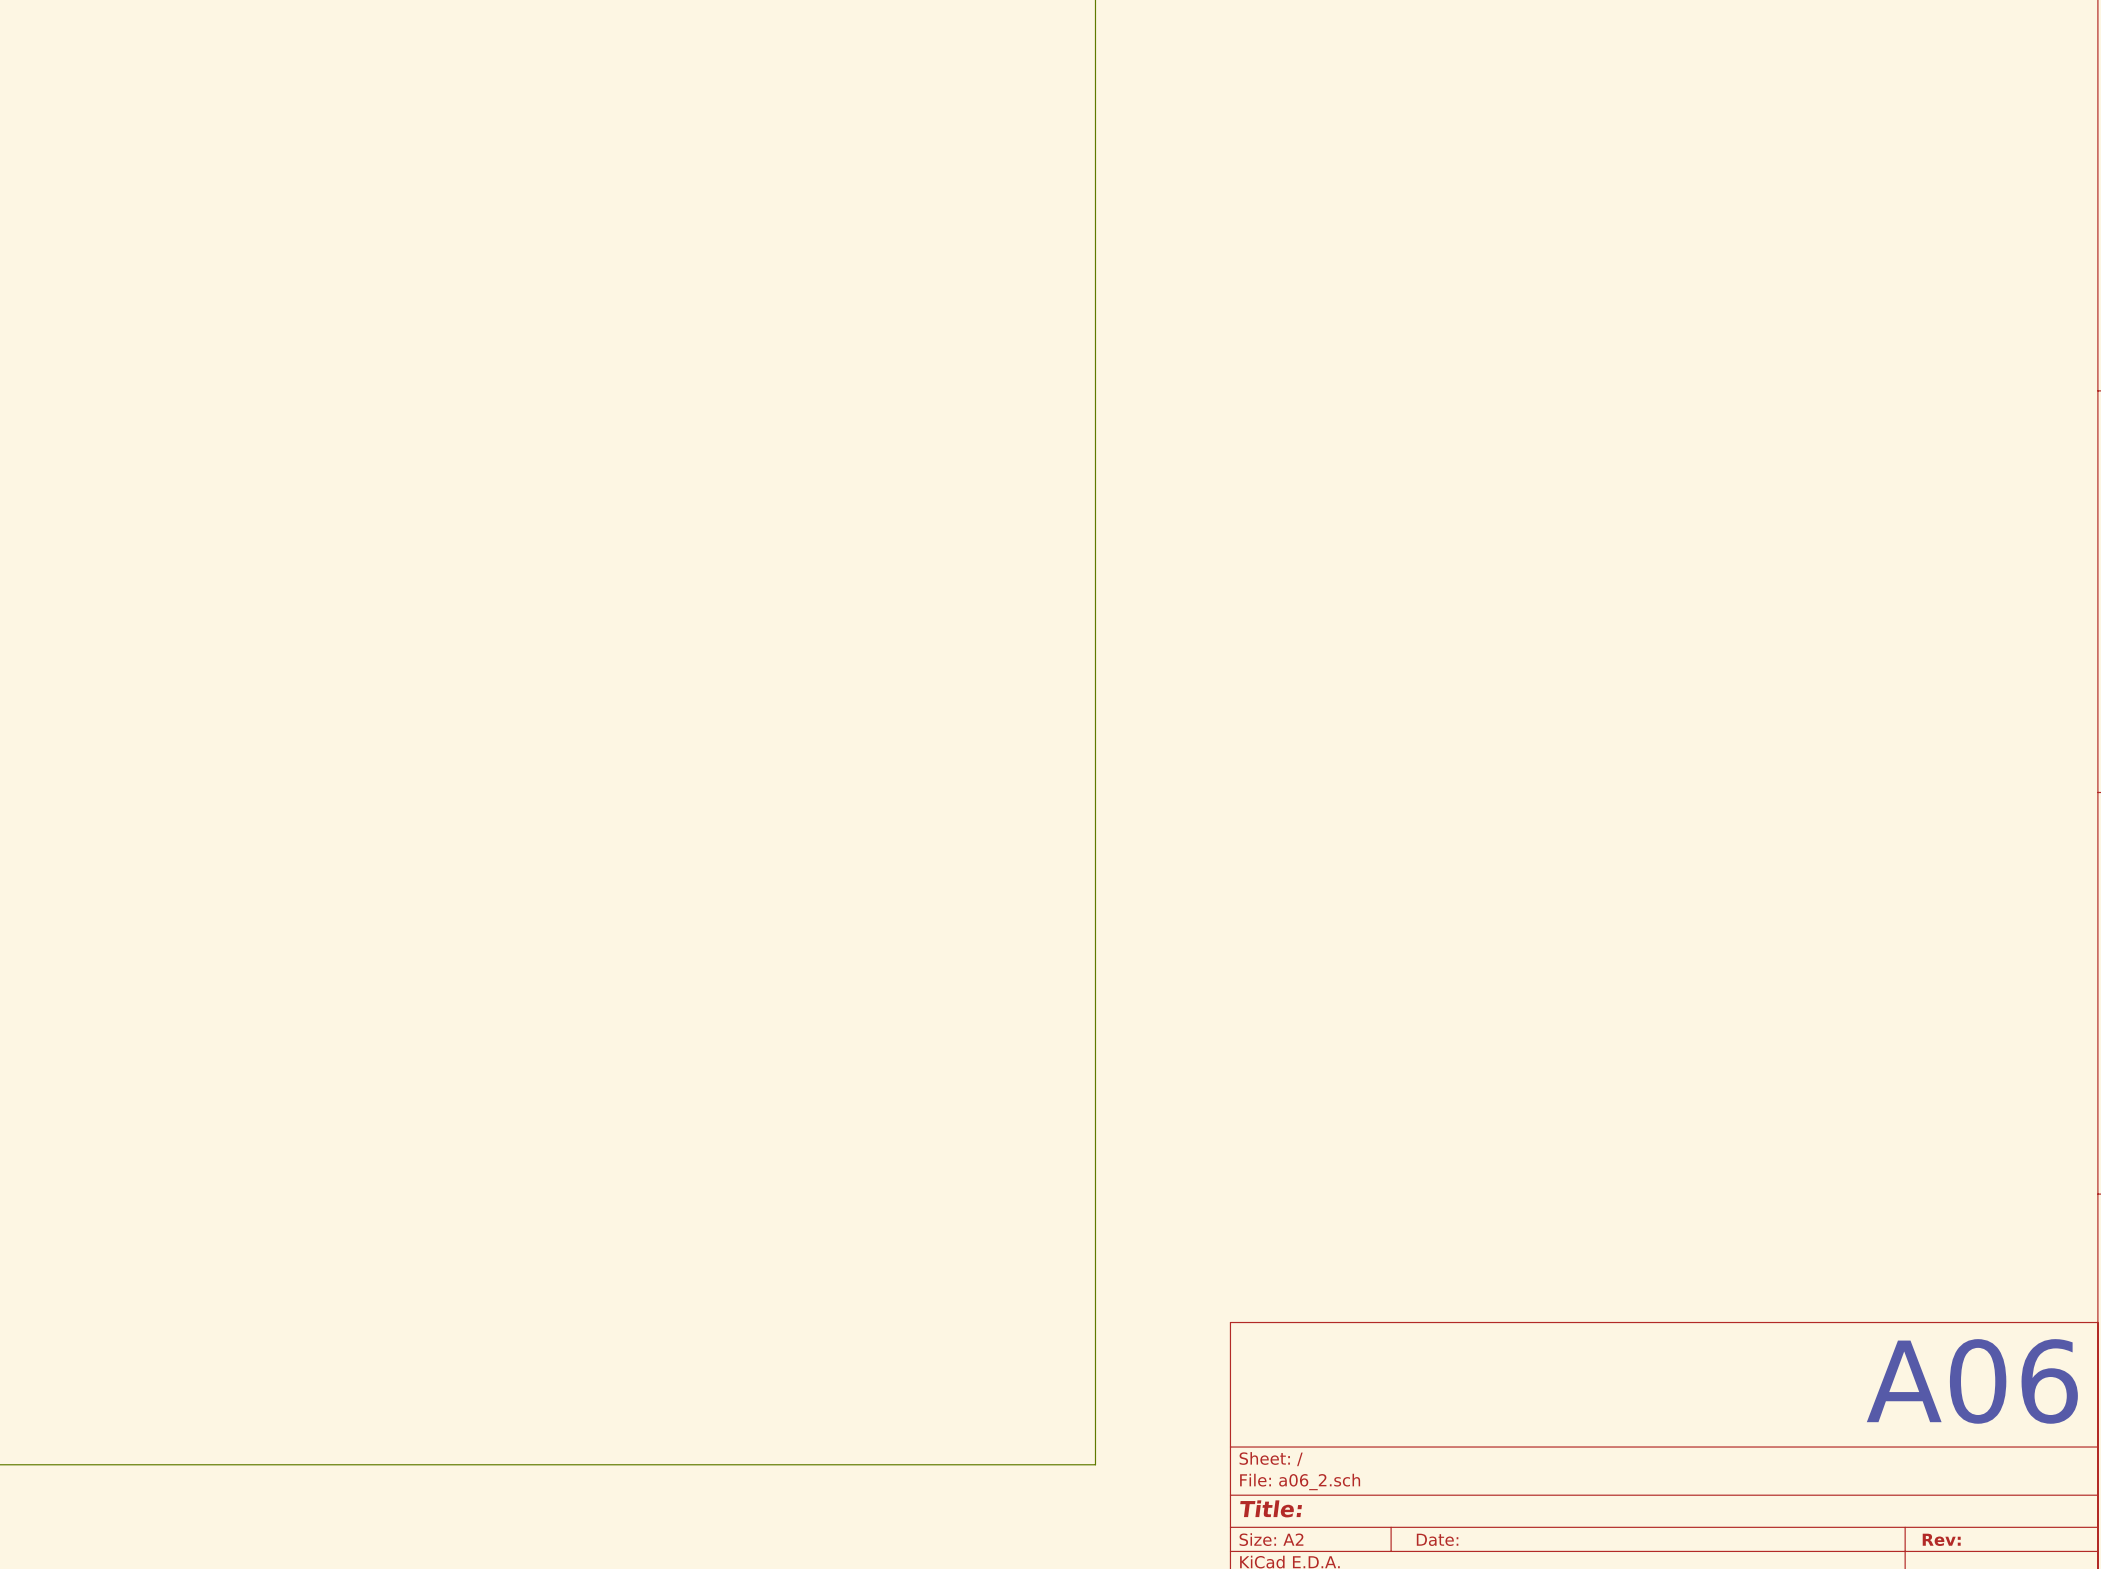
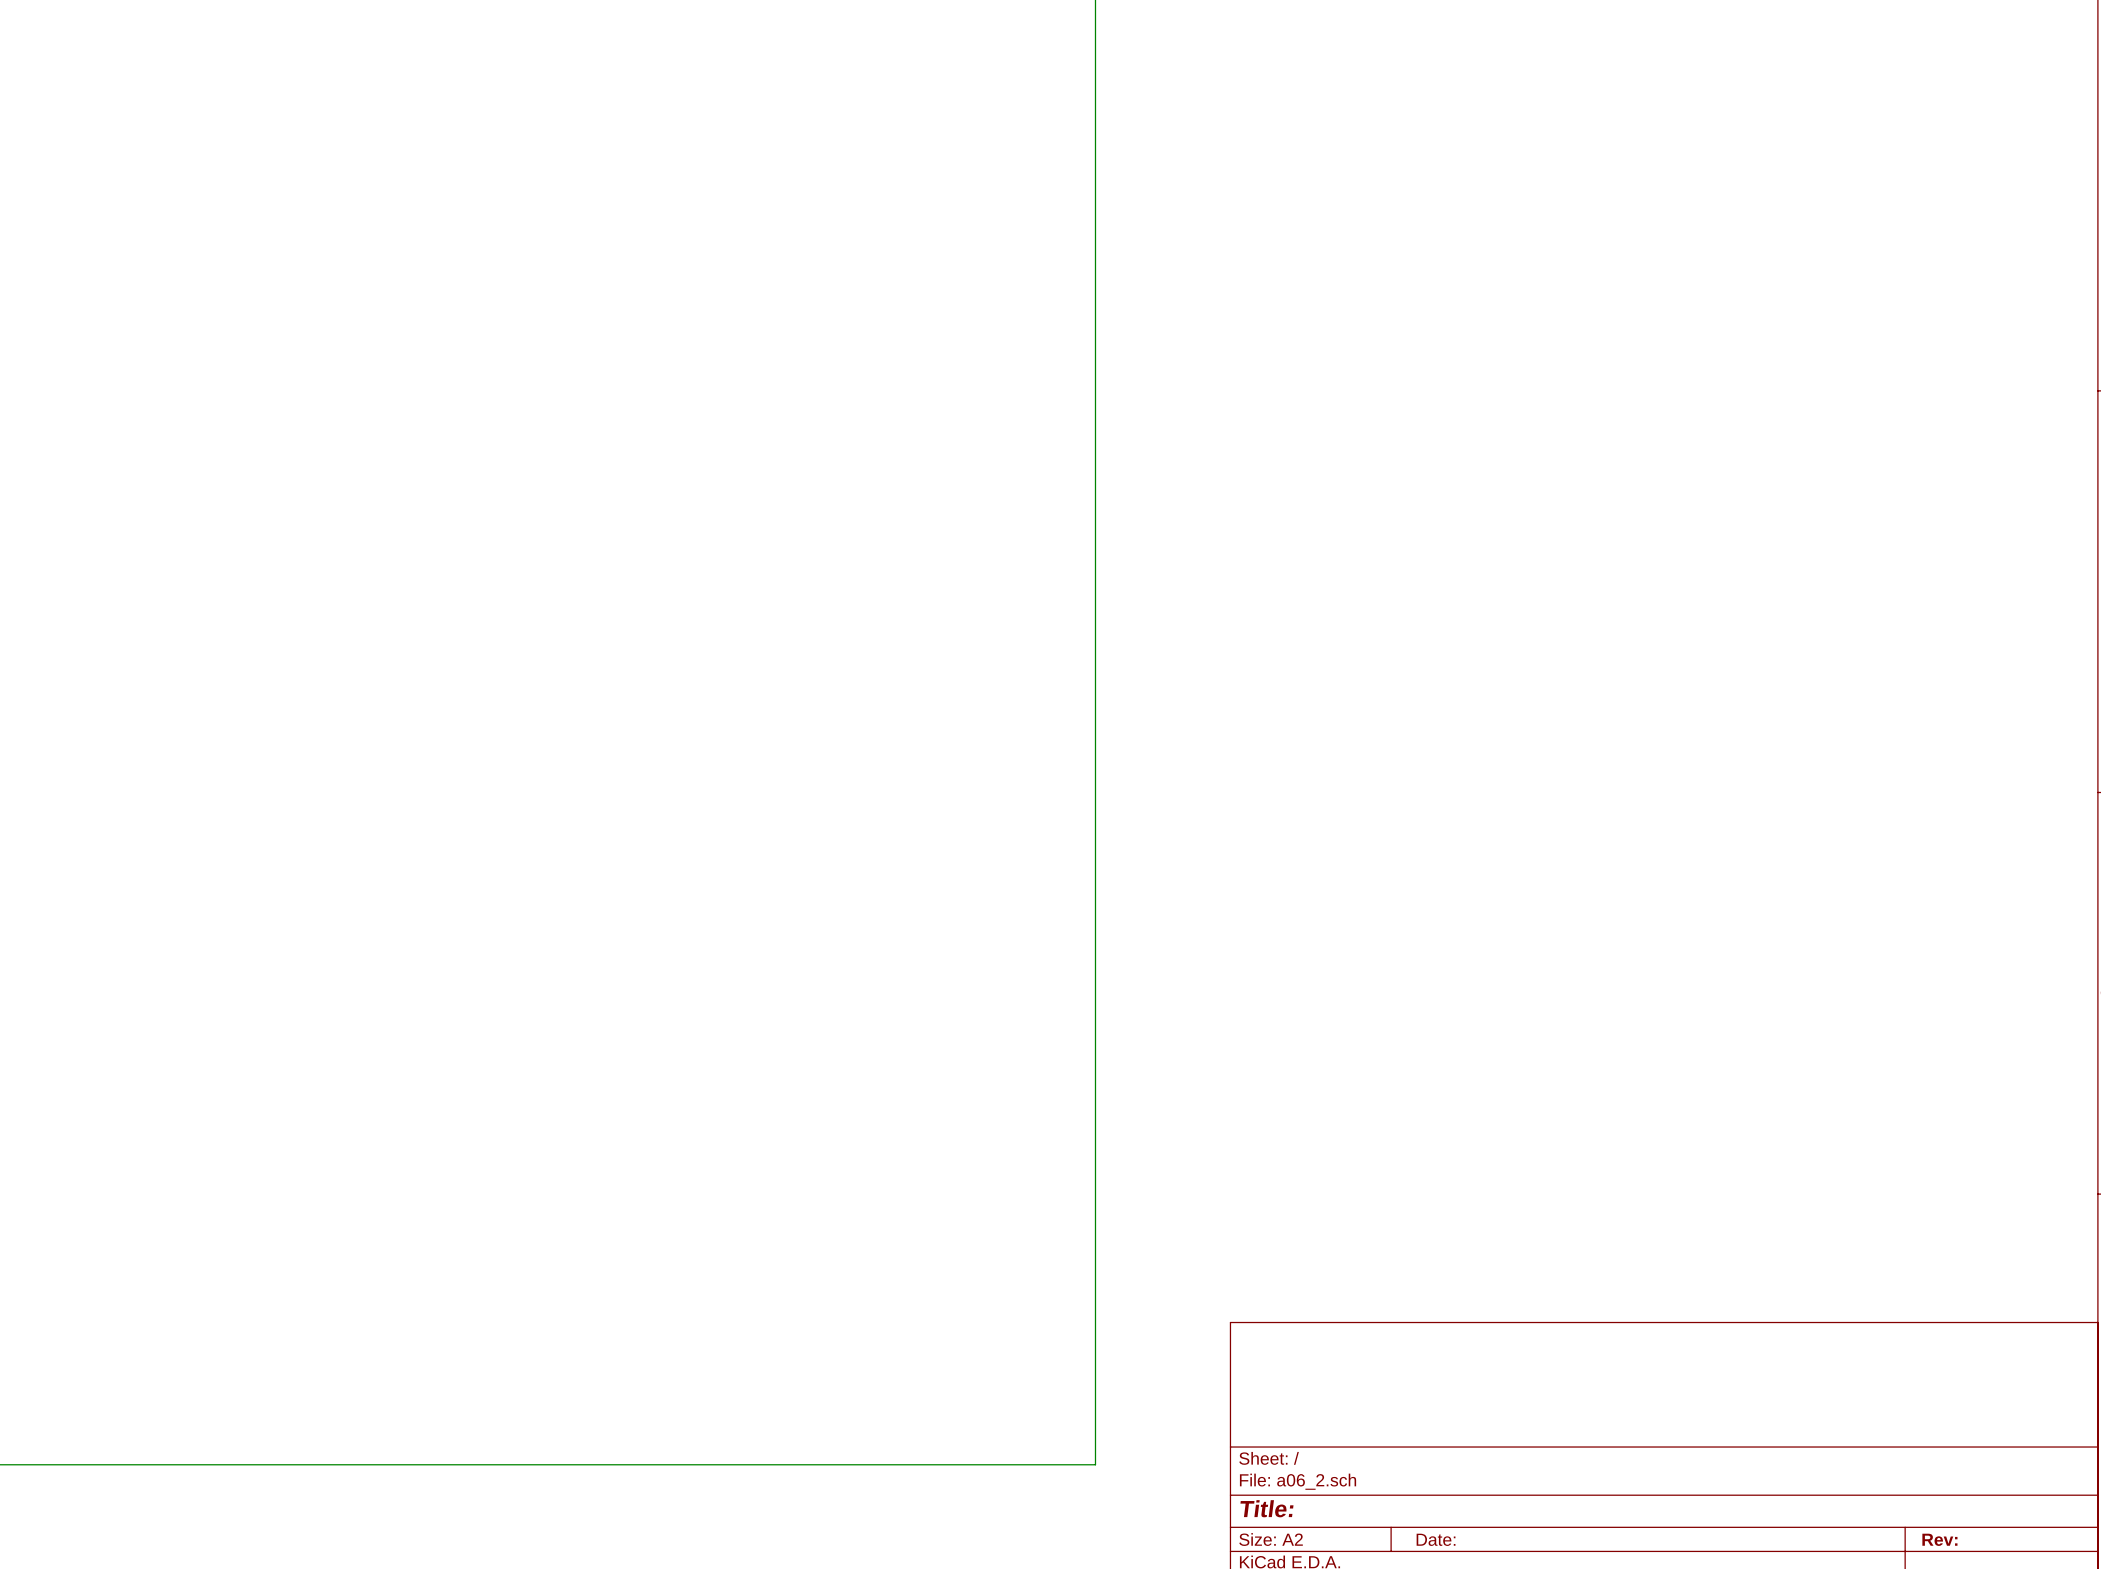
text: A06 (1972, 1381) -> none

